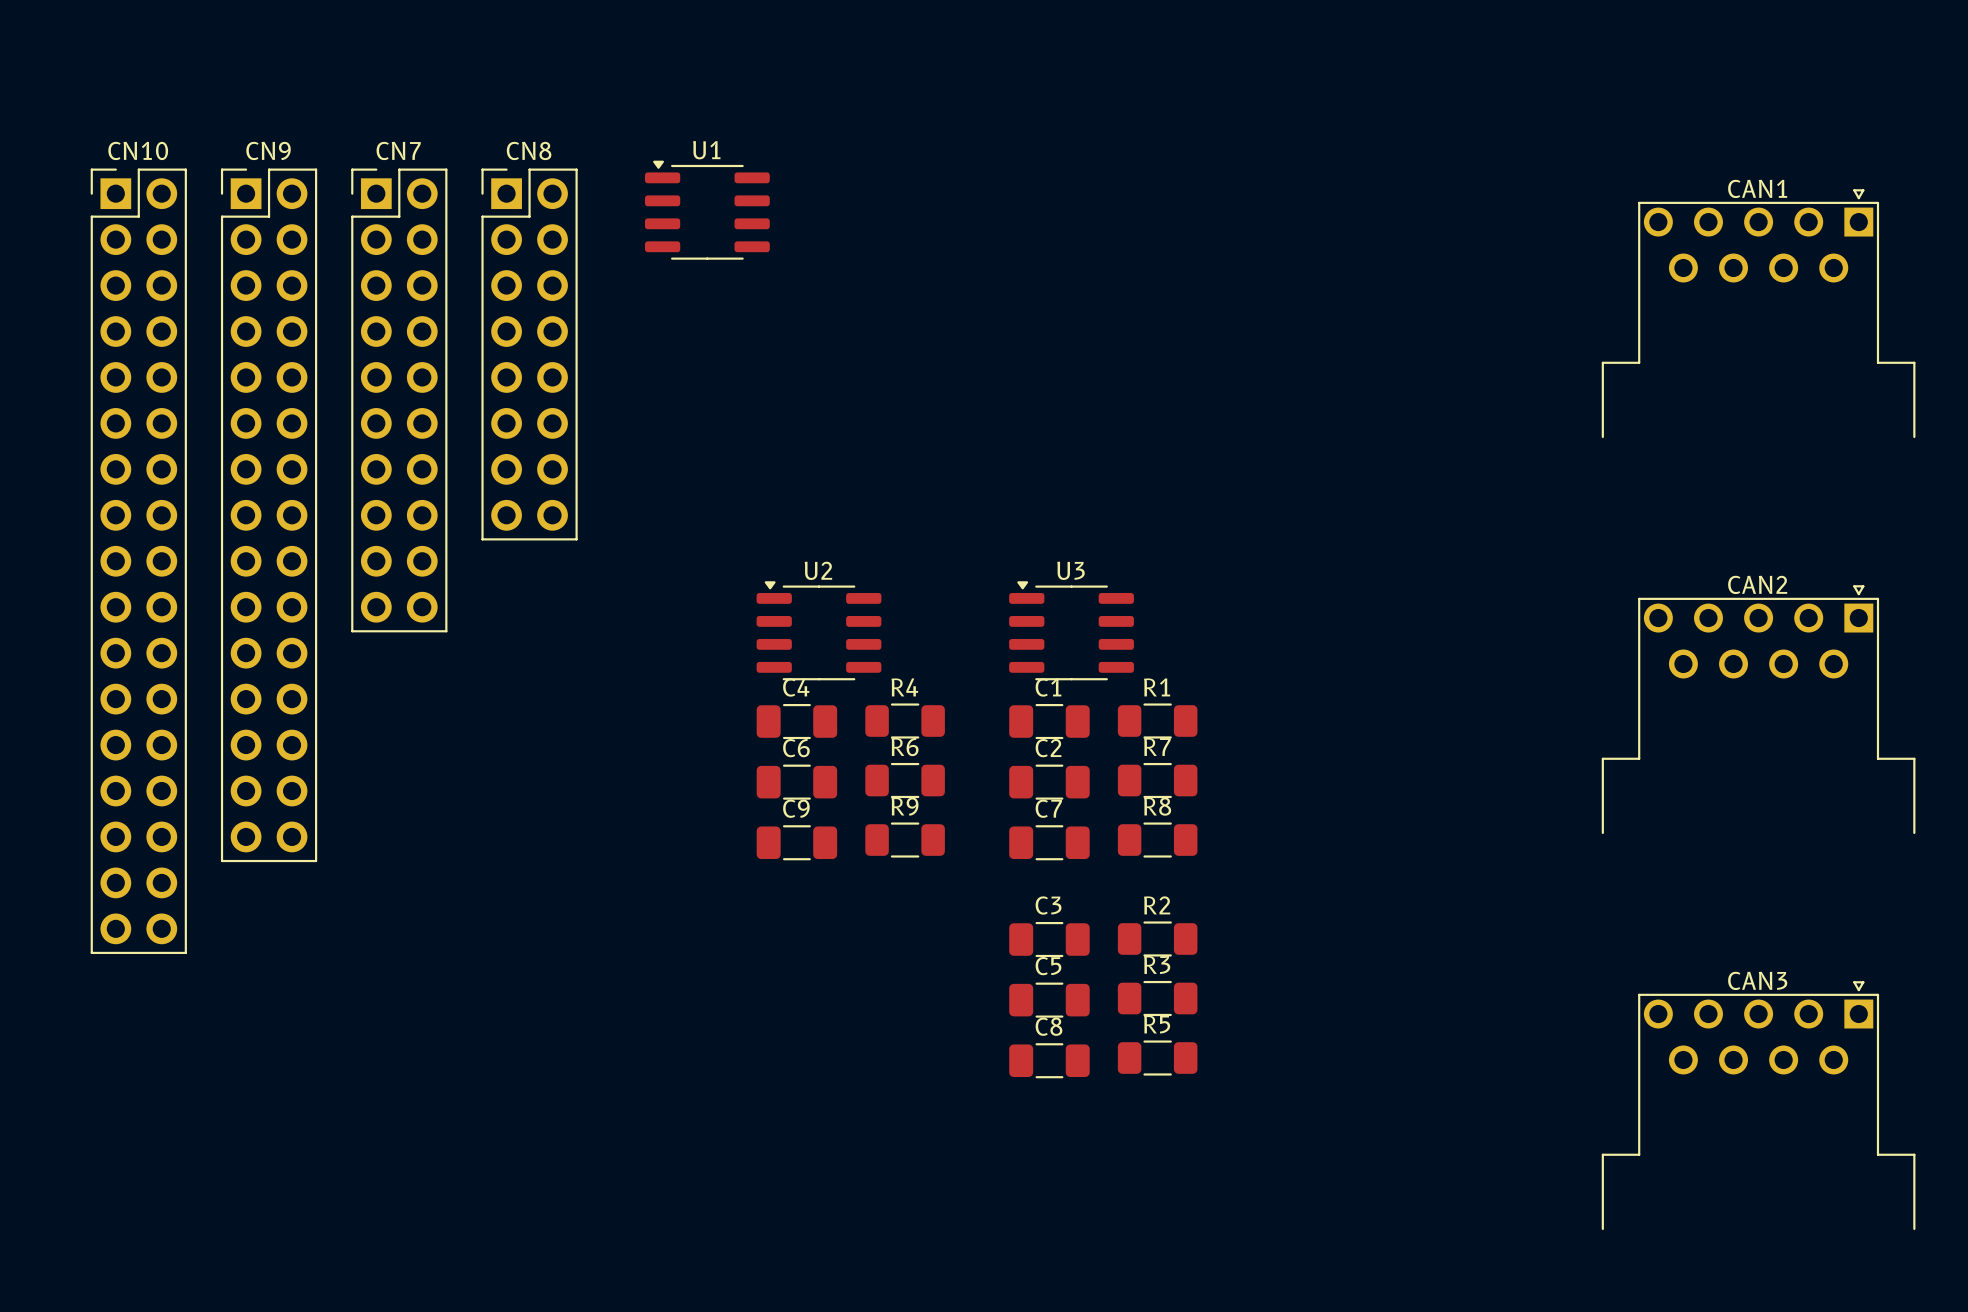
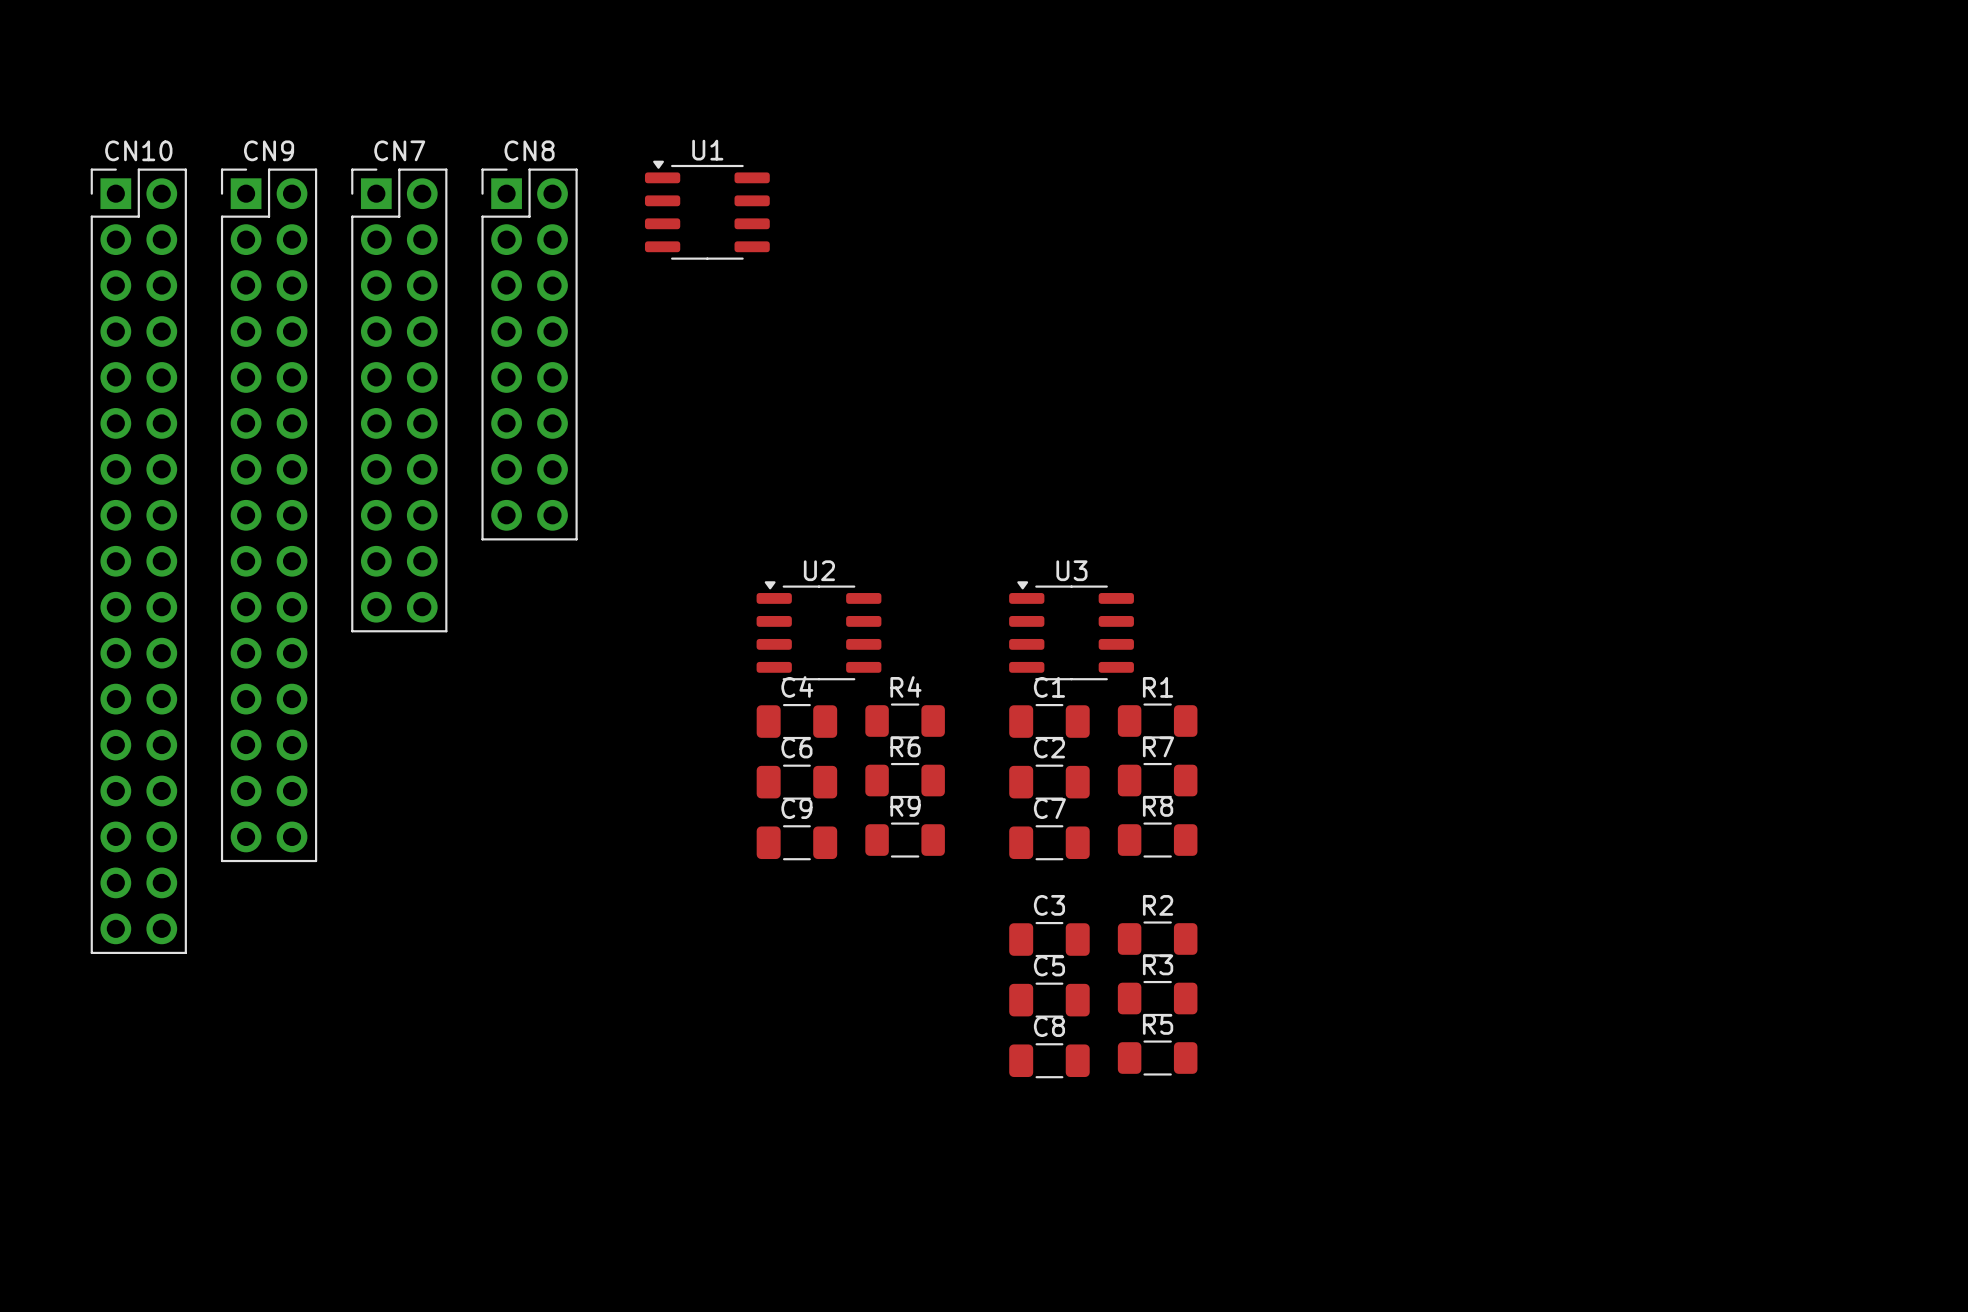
CAN1: (1758, 313) -> none
CAN2: (1758, 709) -> none
CAN3: (1758, 1105) -> none

